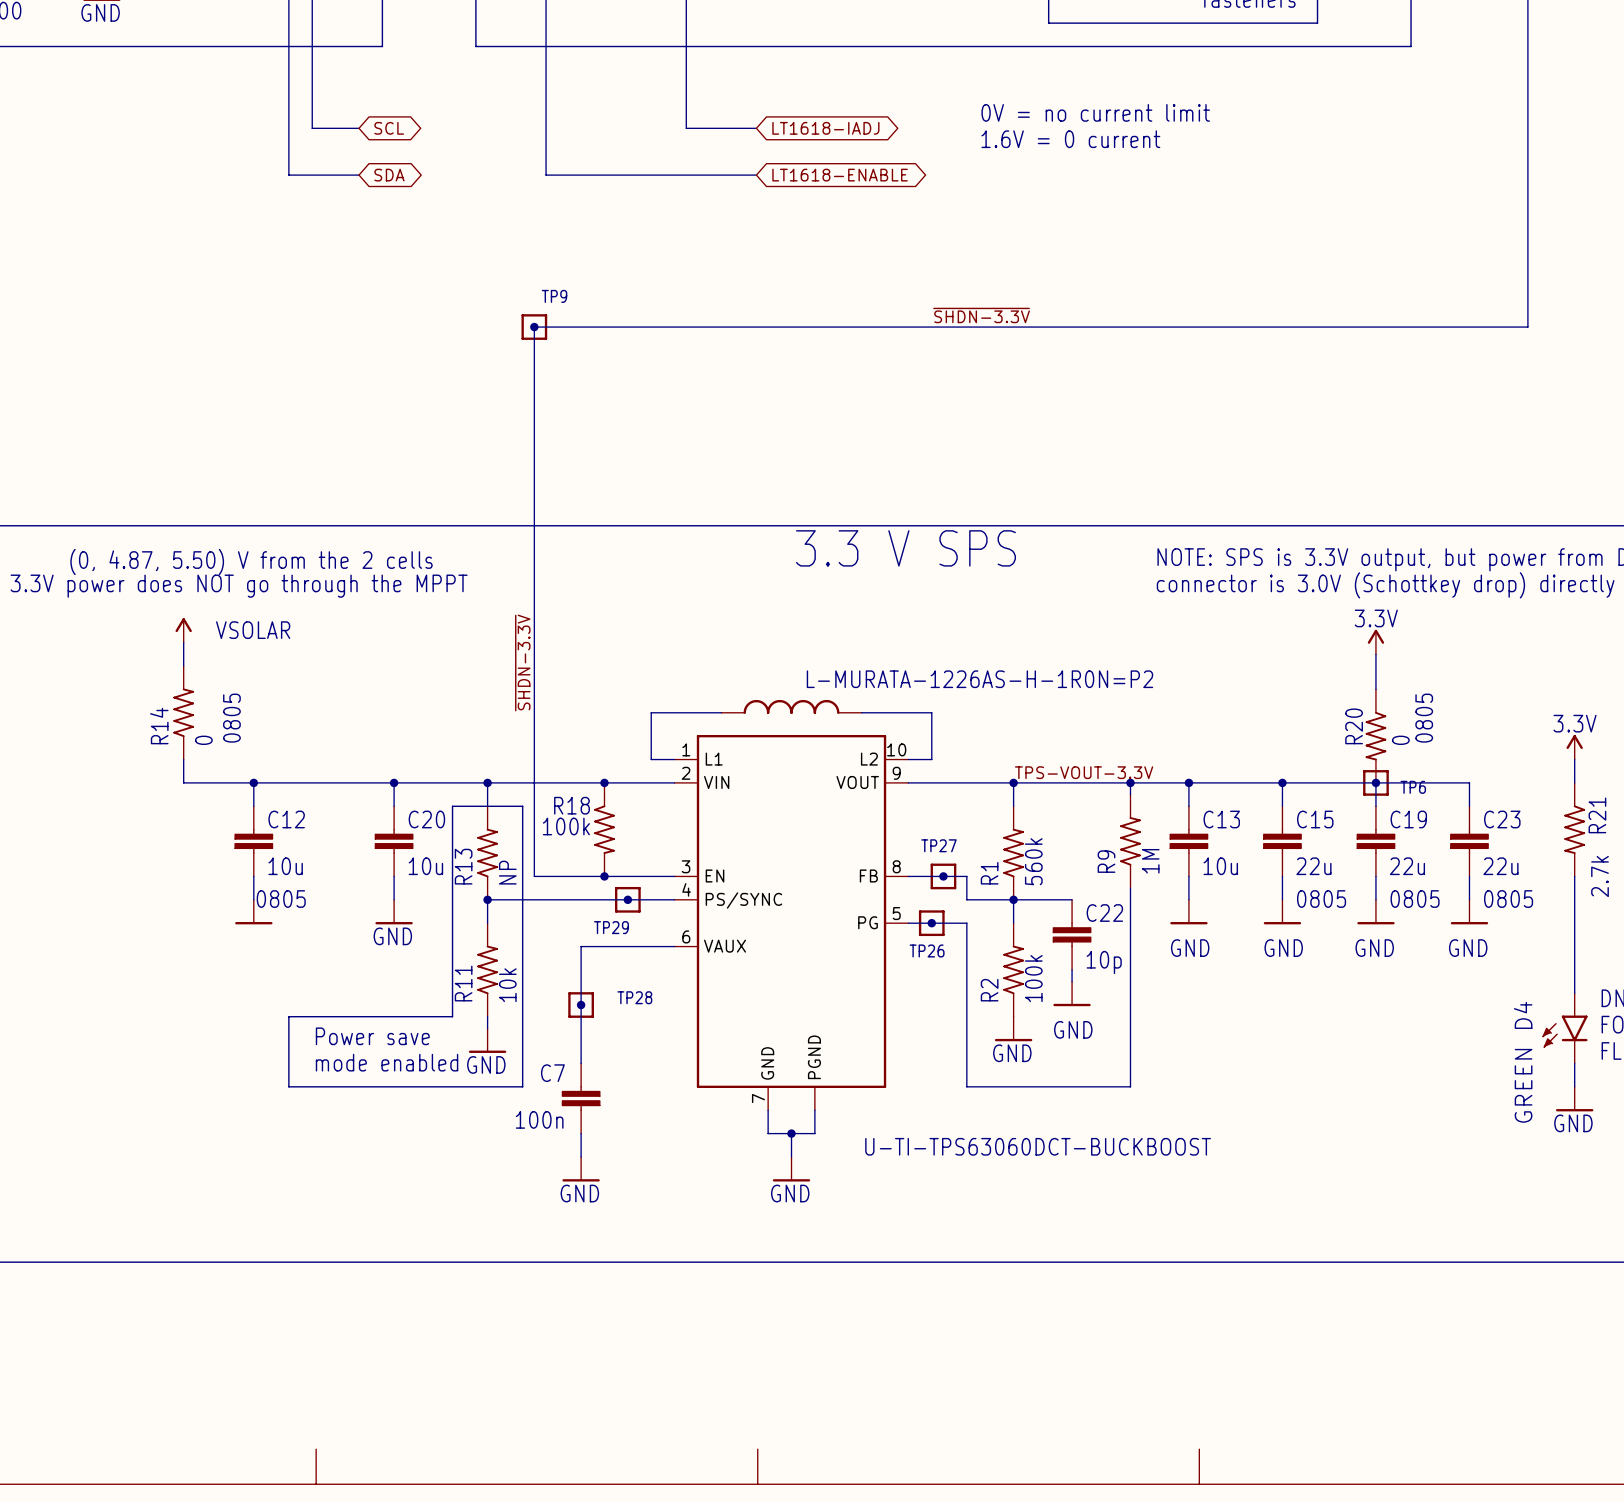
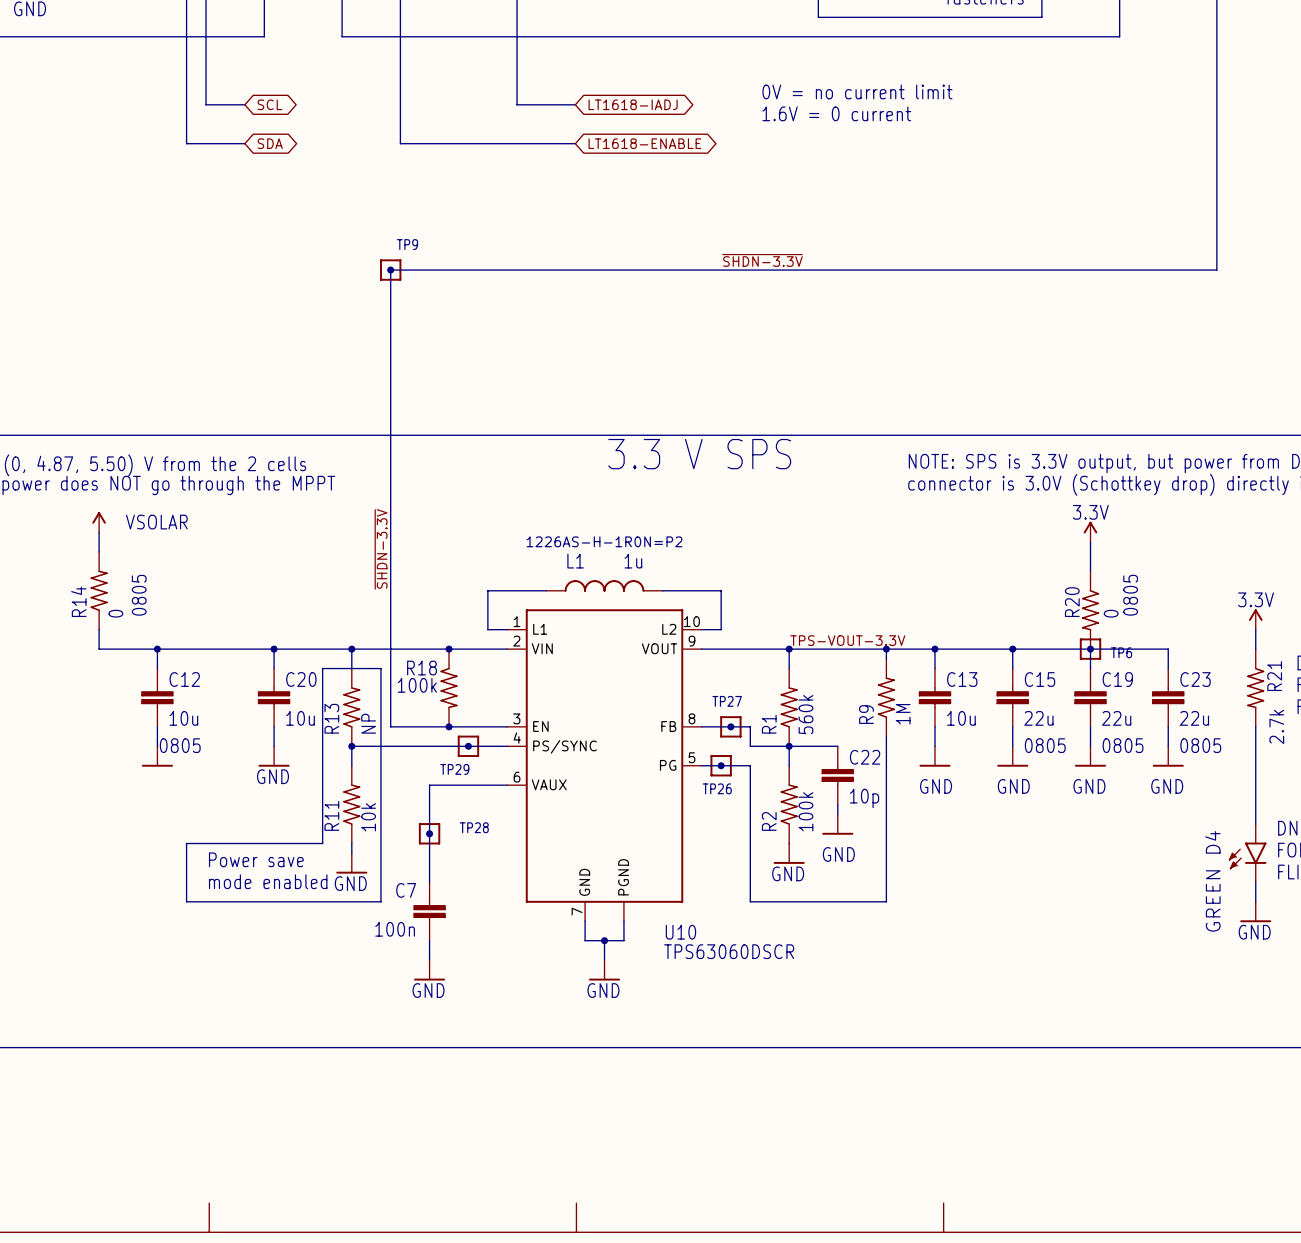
L1 text: none -> 1226AS-H-1R0N=P2 (604, 541)
L1 name: none -> L1 (575, 561)
L1 value: L-MURATA-1226AS-H-1R0N=P2 (979, 679) -> 1u (633, 561)
U10 name: none -> U10 (680, 932)
U10 value: U-TI-TPS63060DCT-BUCKBOOST (1038, 1146) -> TPS63060DSCR (729, 951)

